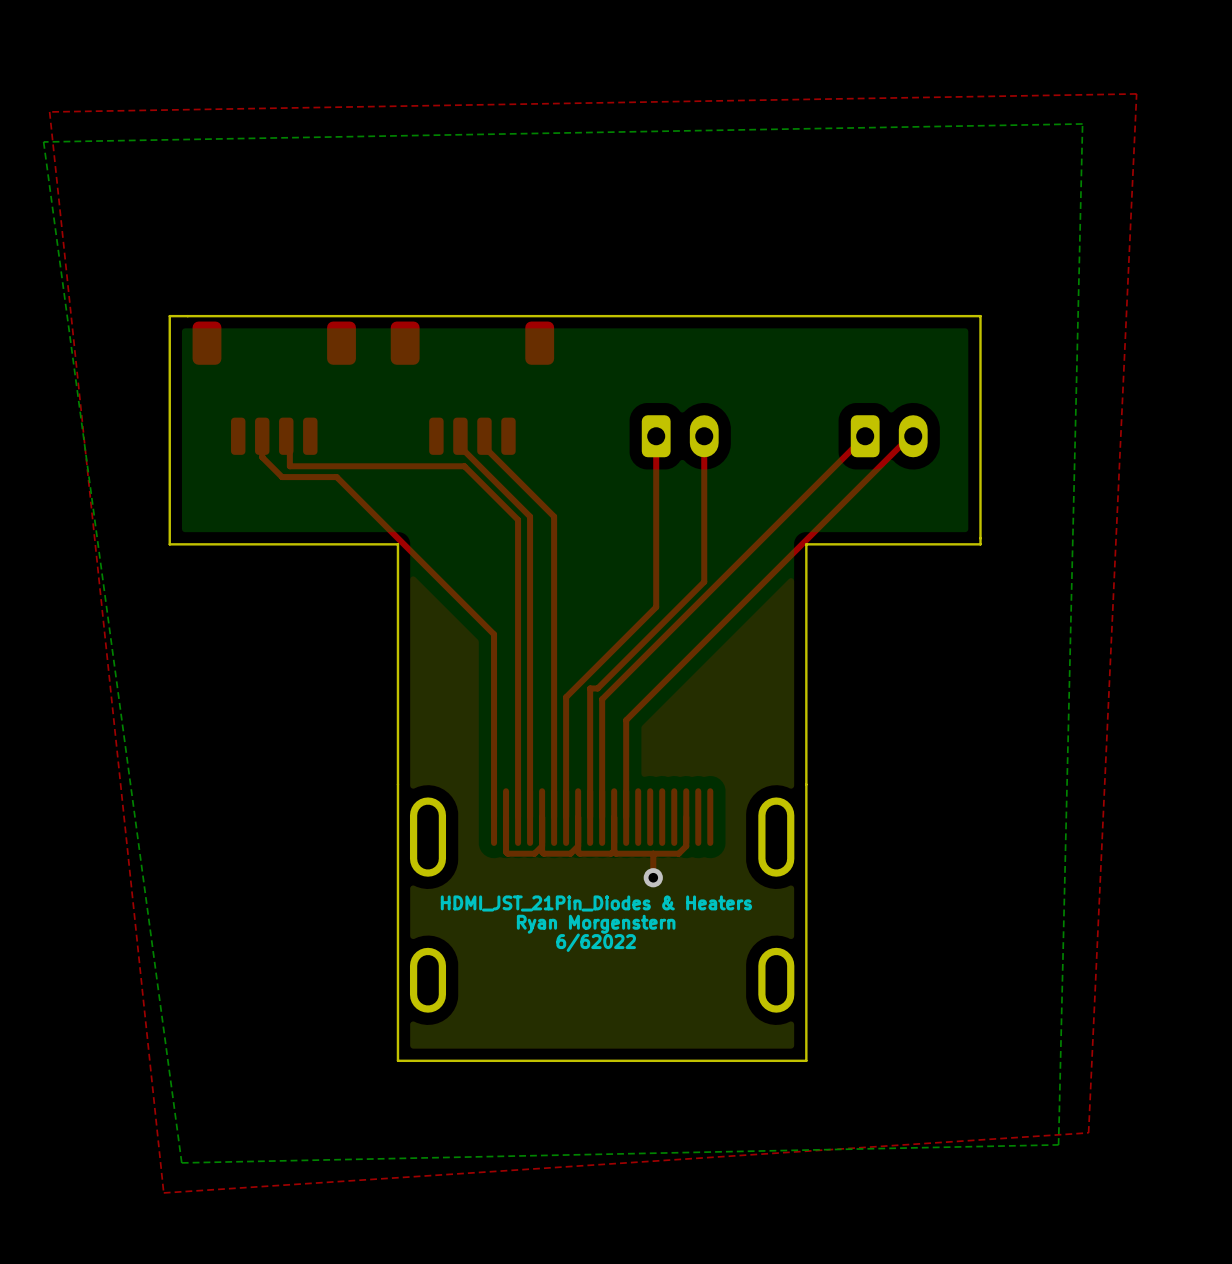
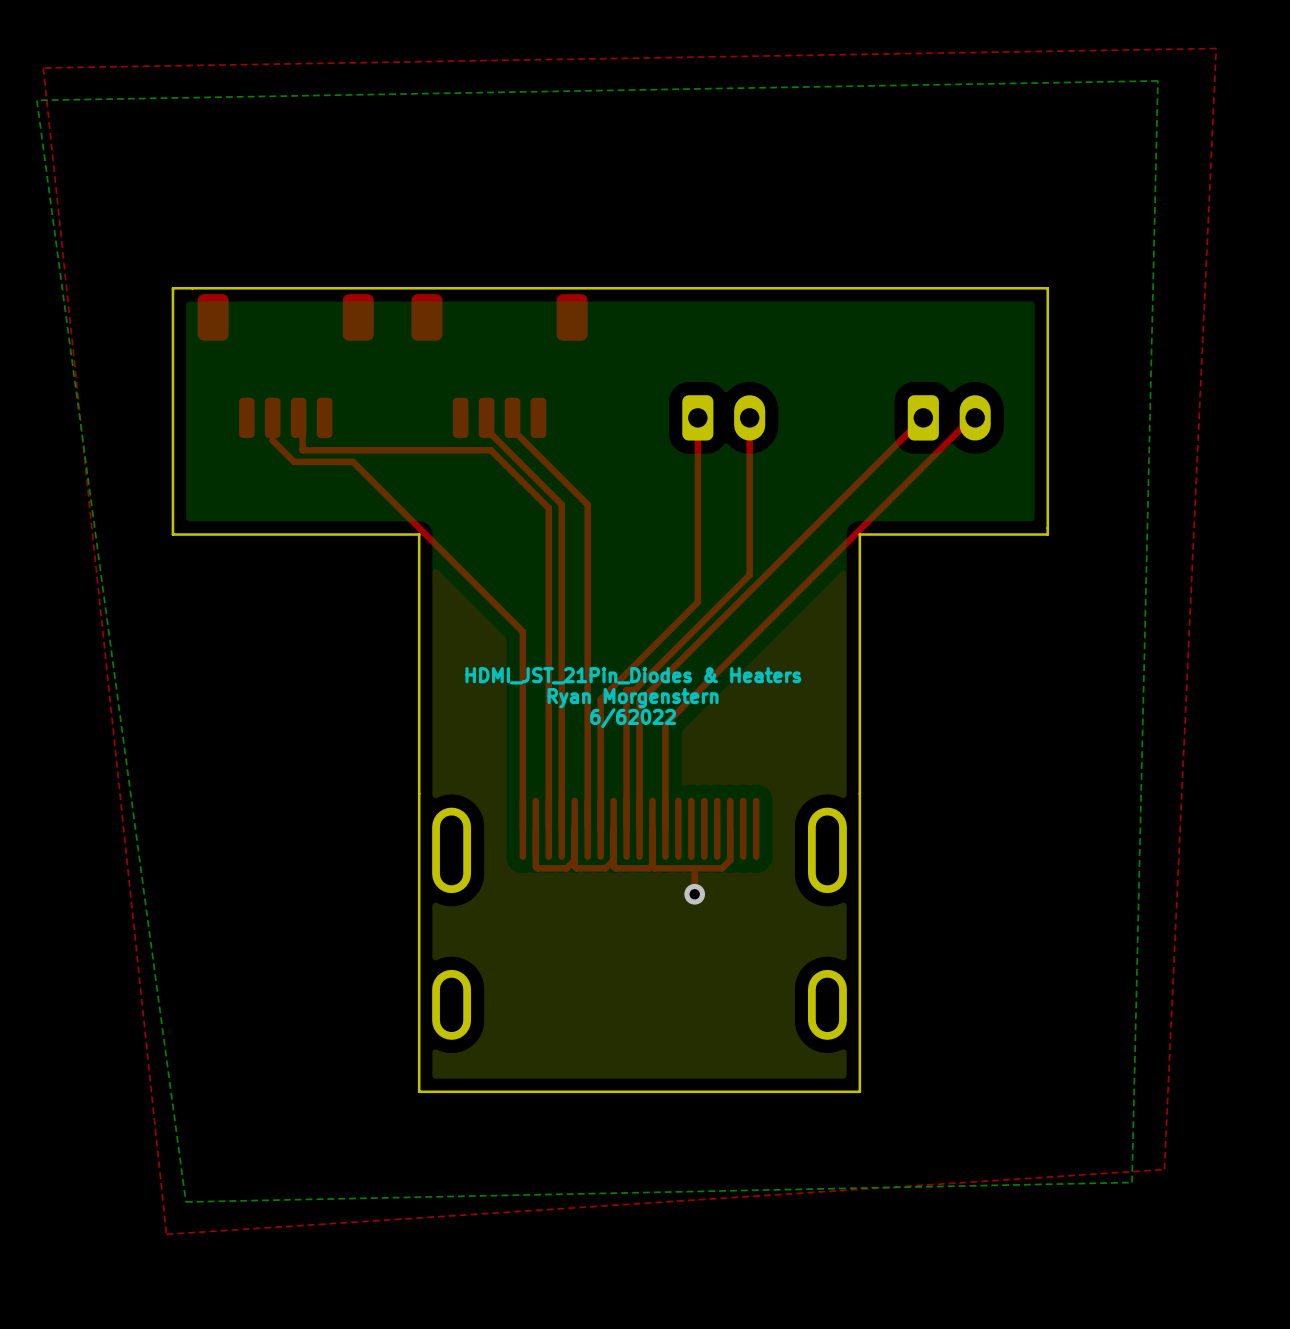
text position: HDMI_JST_21Pin_Diodes & Heaters (596, 903) -> HDMI_JST_21Pin_Diodes & Heaters (633, 675)
text position: Ryan Morgenstern (596, 924) -> Ryan Morgenstern (633, 698)
text position: 6/62022 (596, 942) -> 6/62022 (633, 718)

